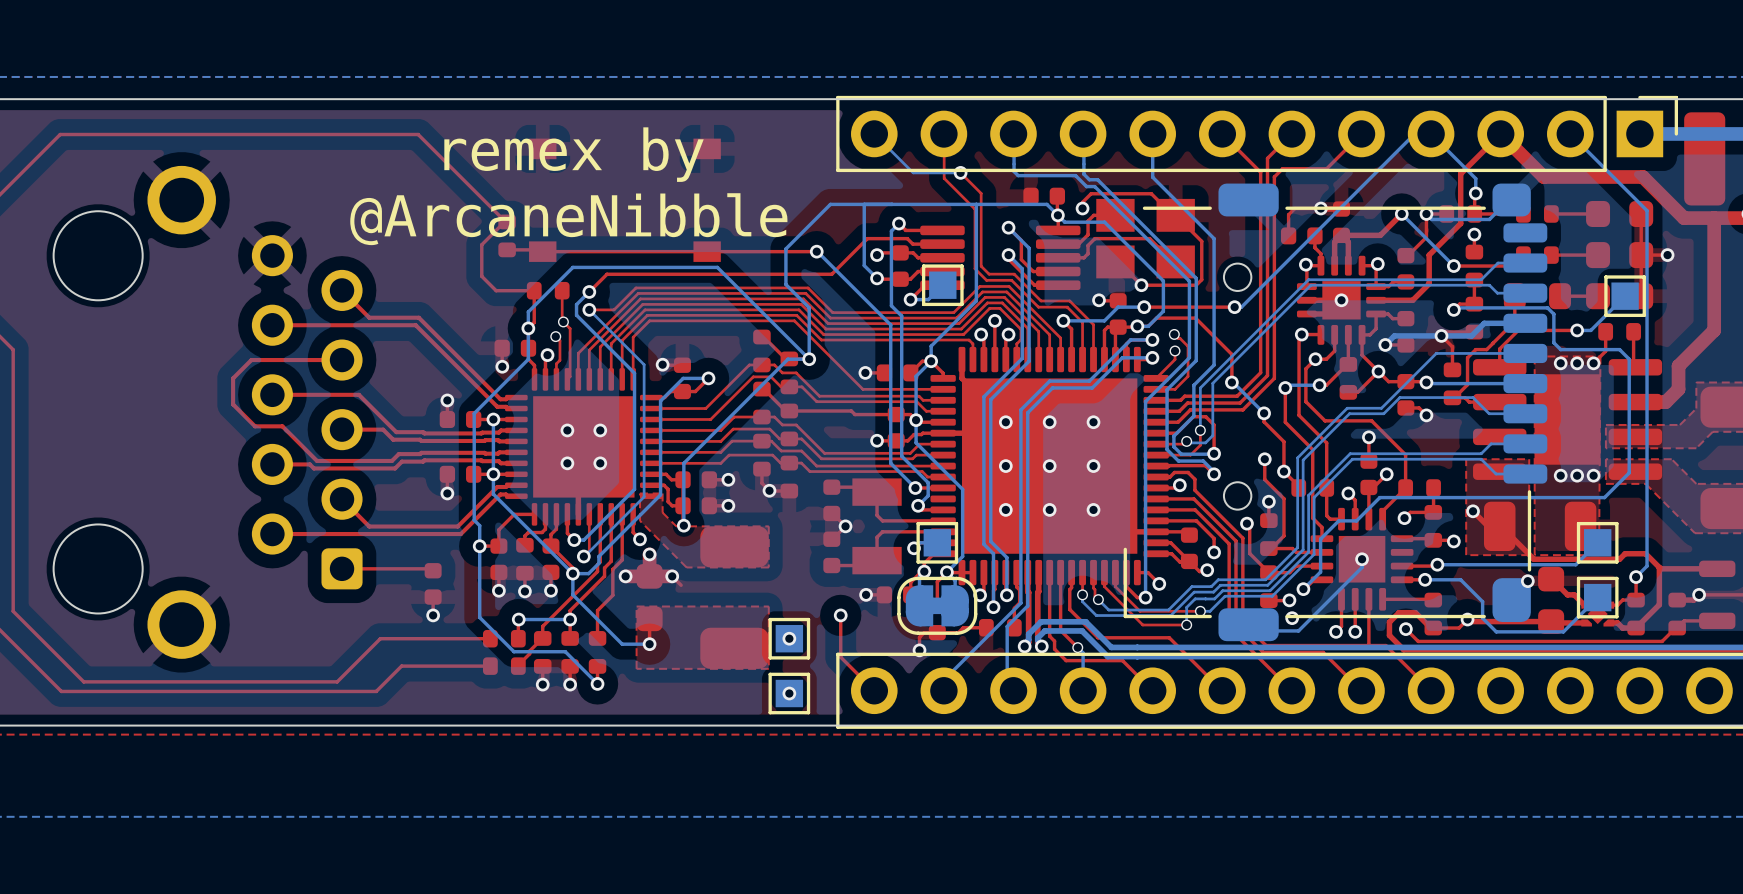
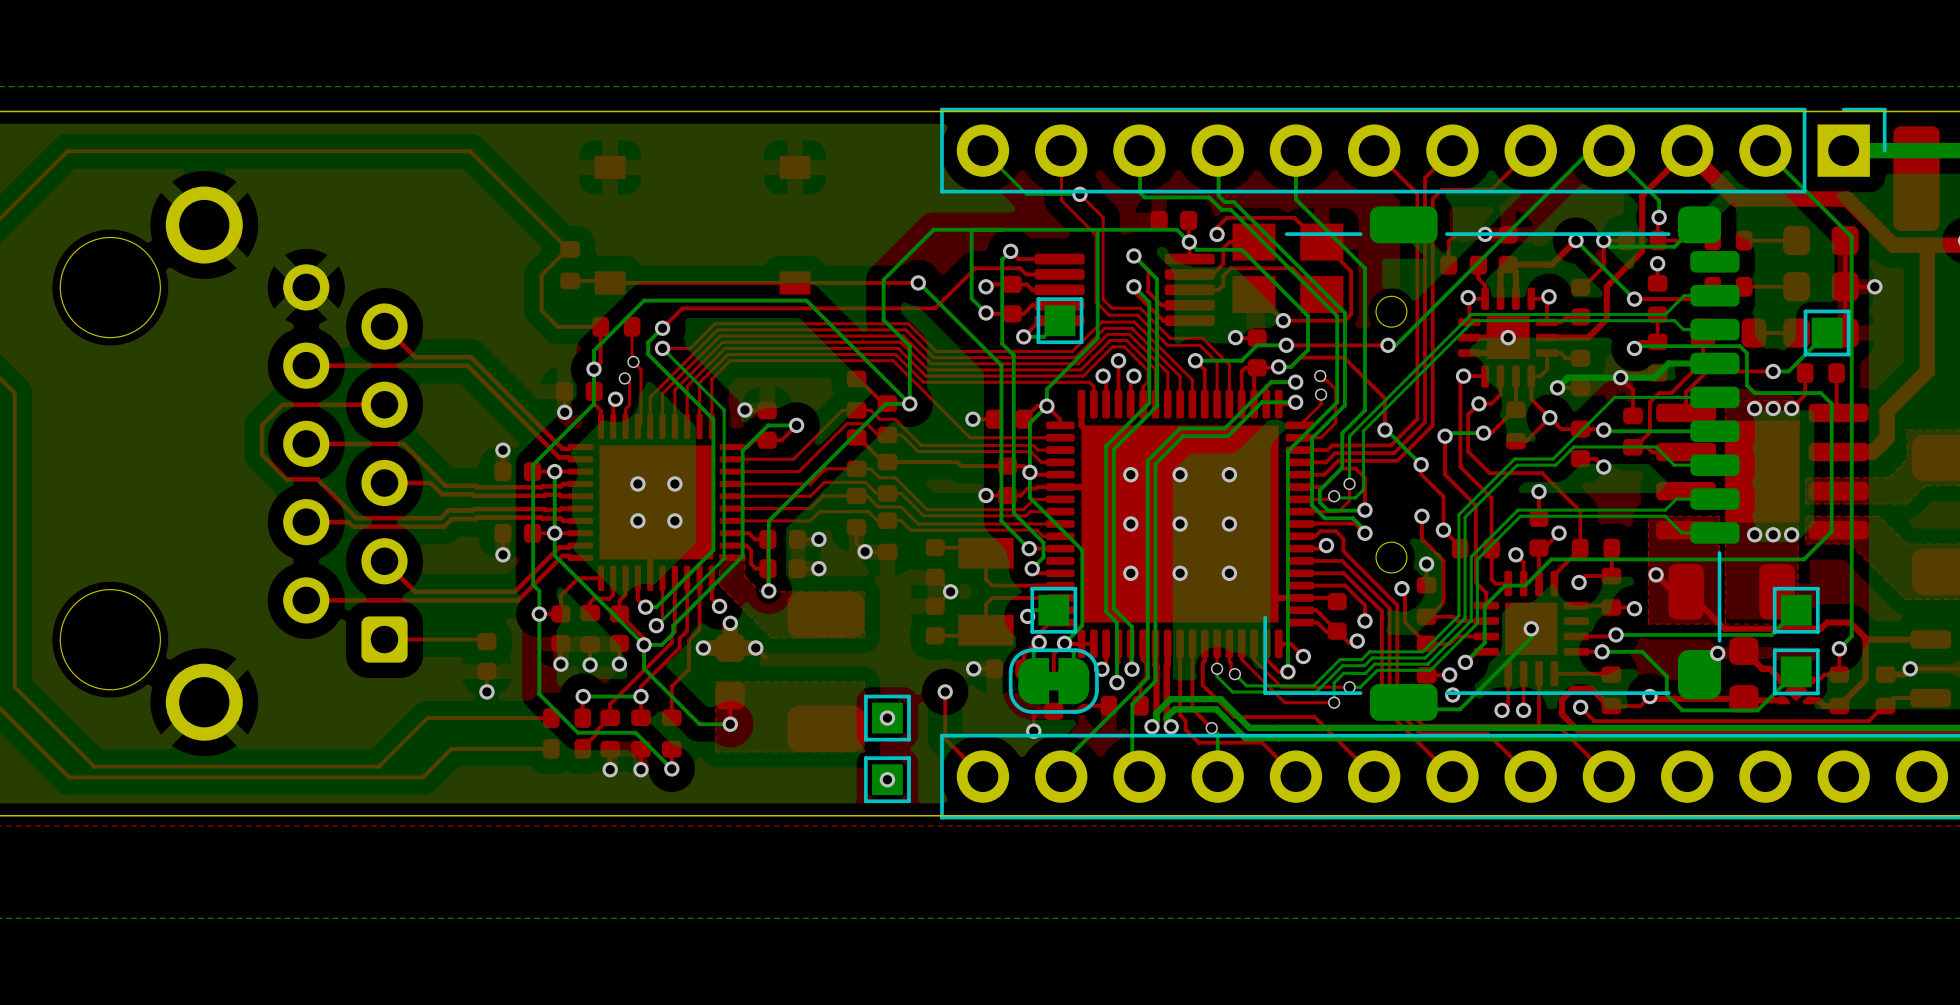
text: remex by (574, 154) -> none
text: @ArcaneNibble (568, 219) -> none

